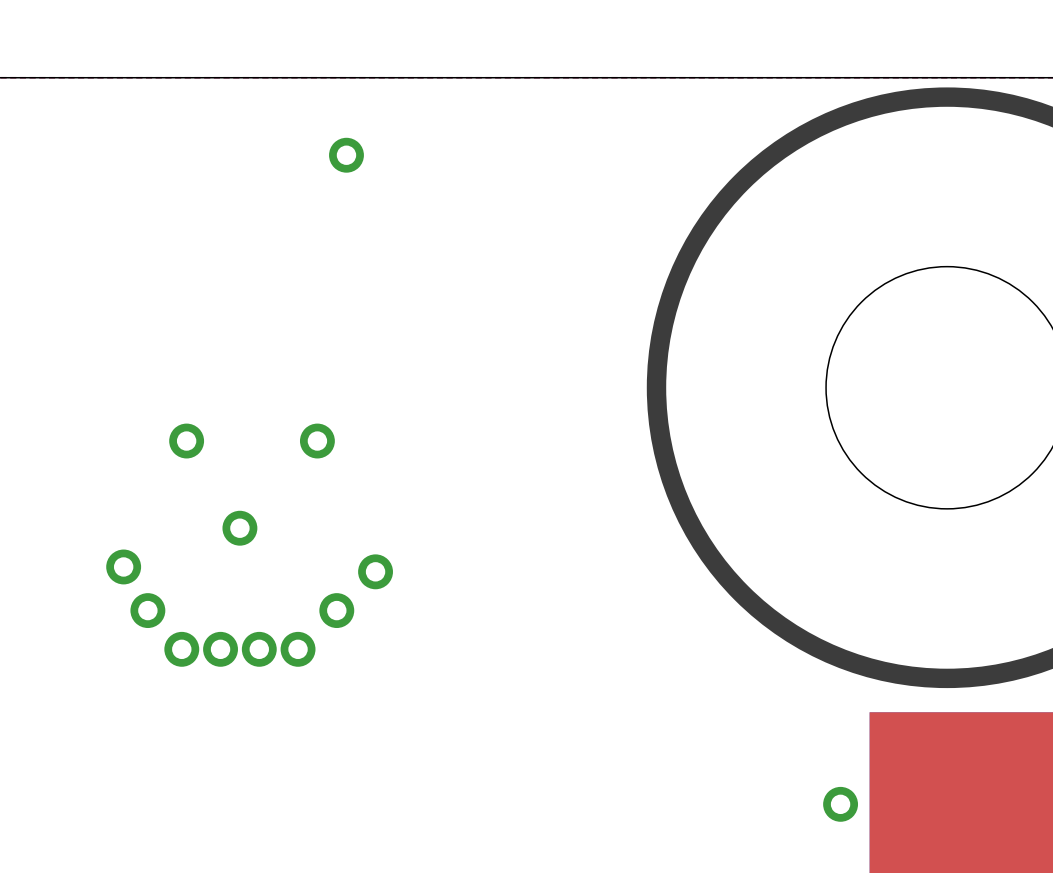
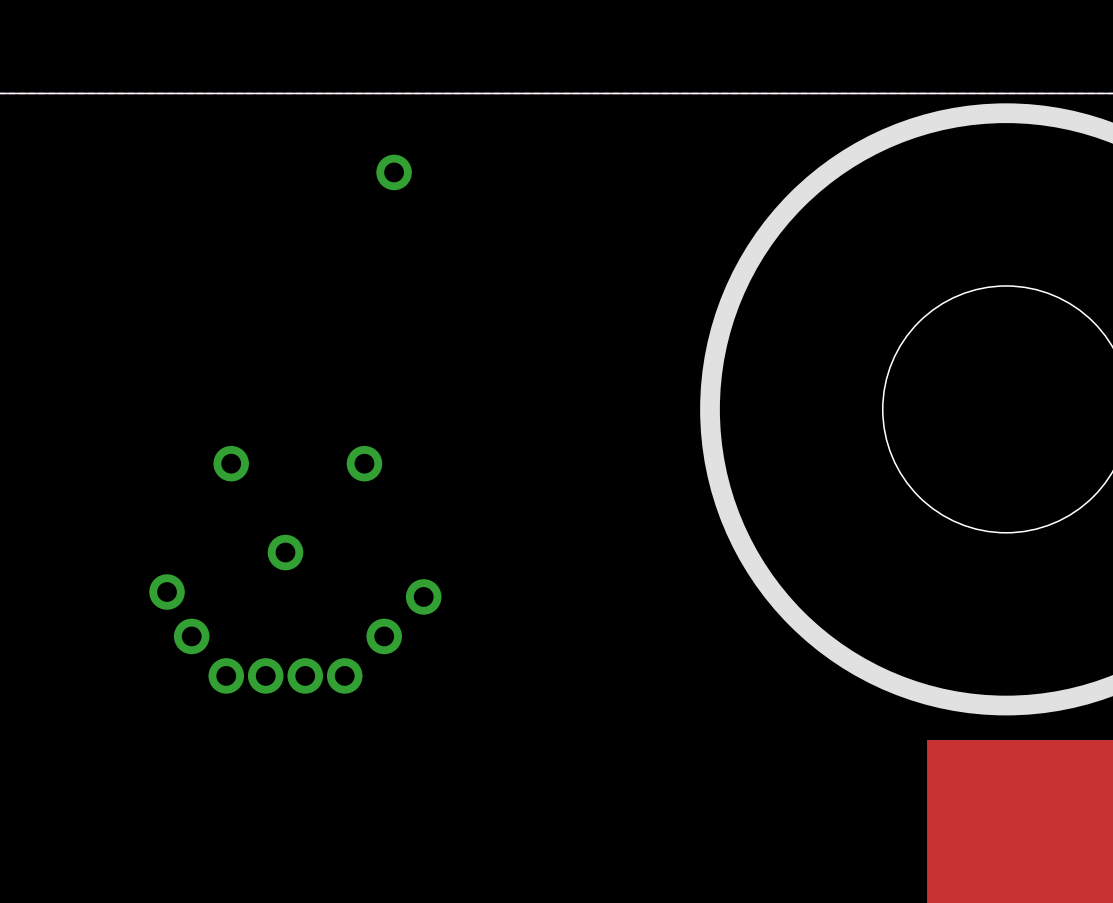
via: (840, 804) -> none

